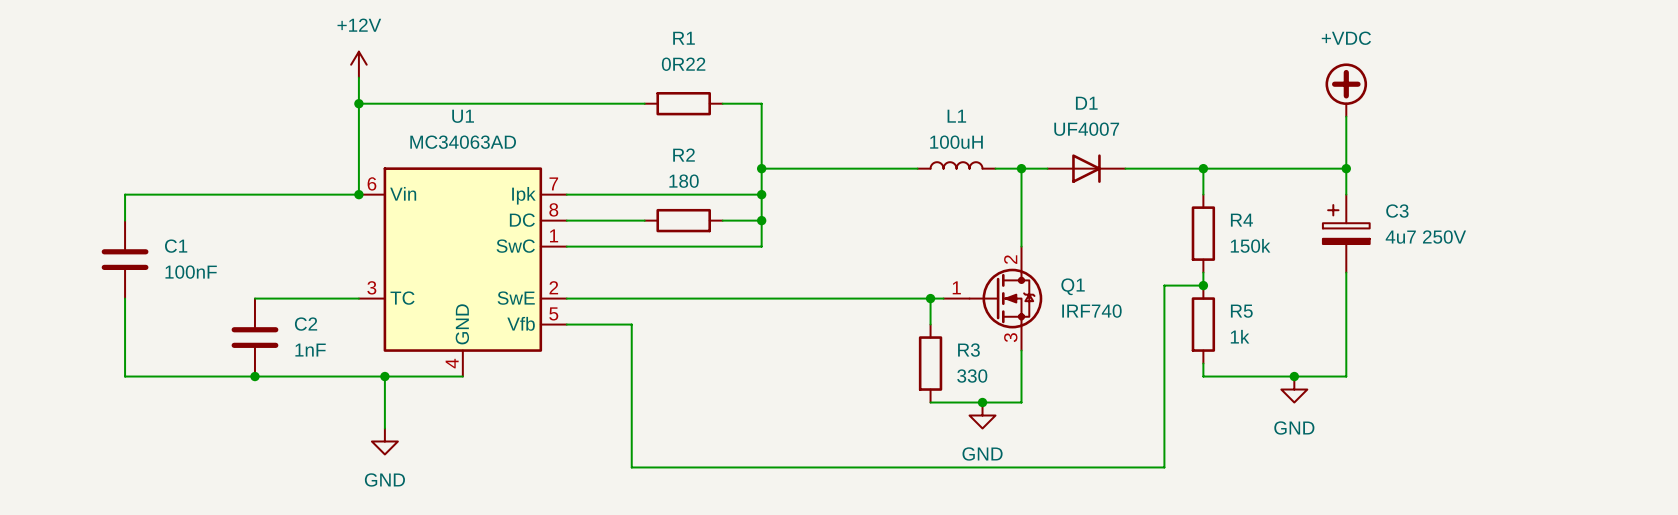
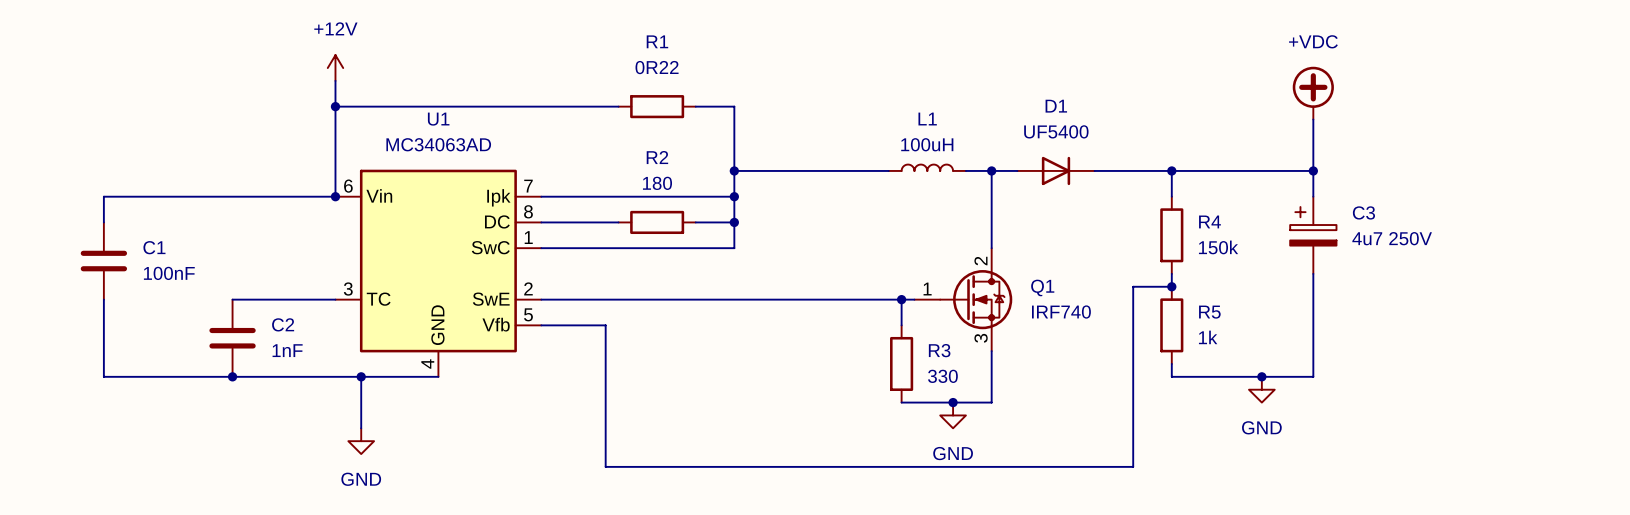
D1 value: UF4007 (1086, 129) -> UF5400 (1056, 131)

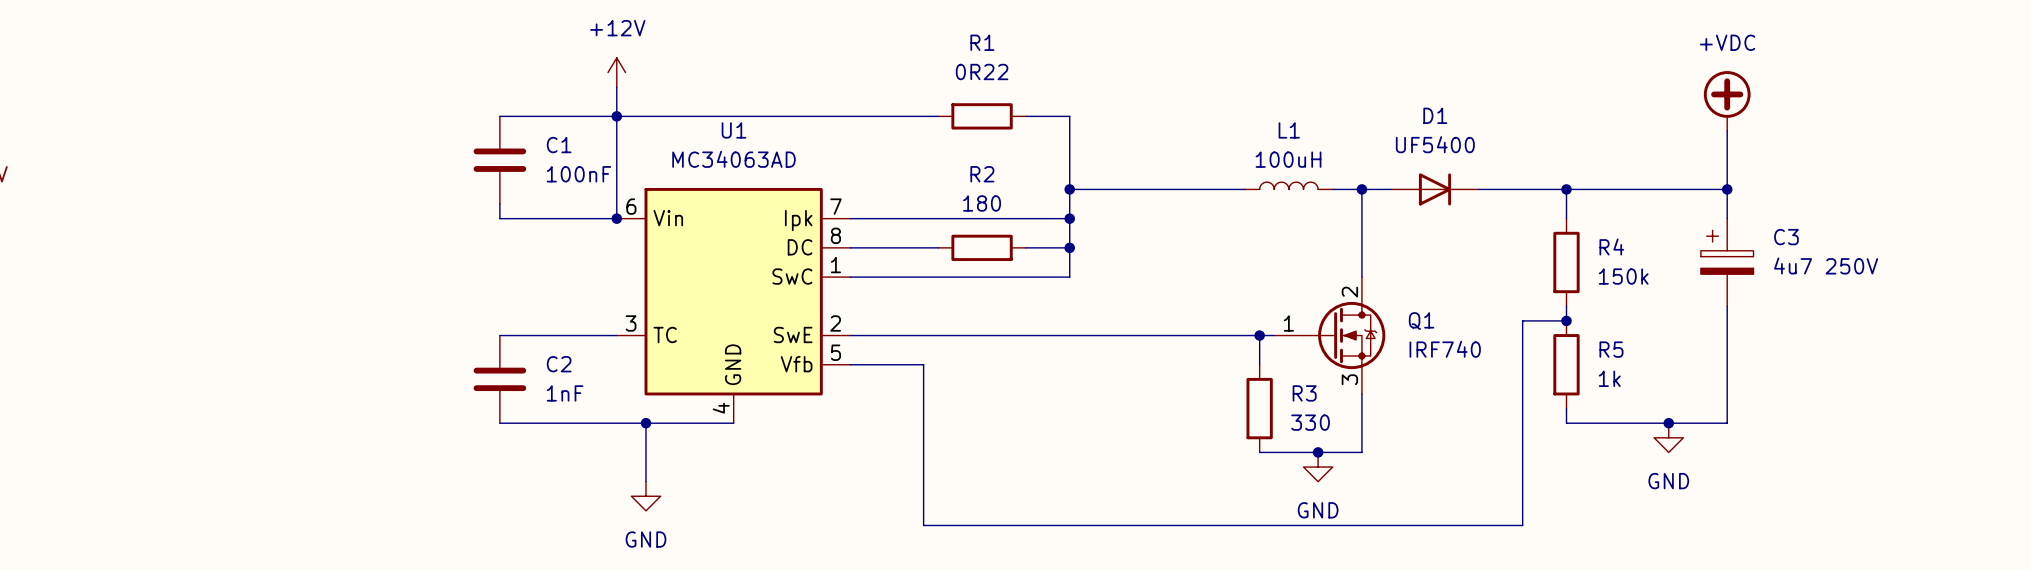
wire: none -> (499, 116) (616, 116)
wire: (232, 196) (103, 196) (103, 222) -> (499, 218) (499, 204)
C1 position: (103, 261) -> (499, 160)
wire: (103, 299) (103, 376) (232, 376) -> none
junction: (232, 376) -> none

